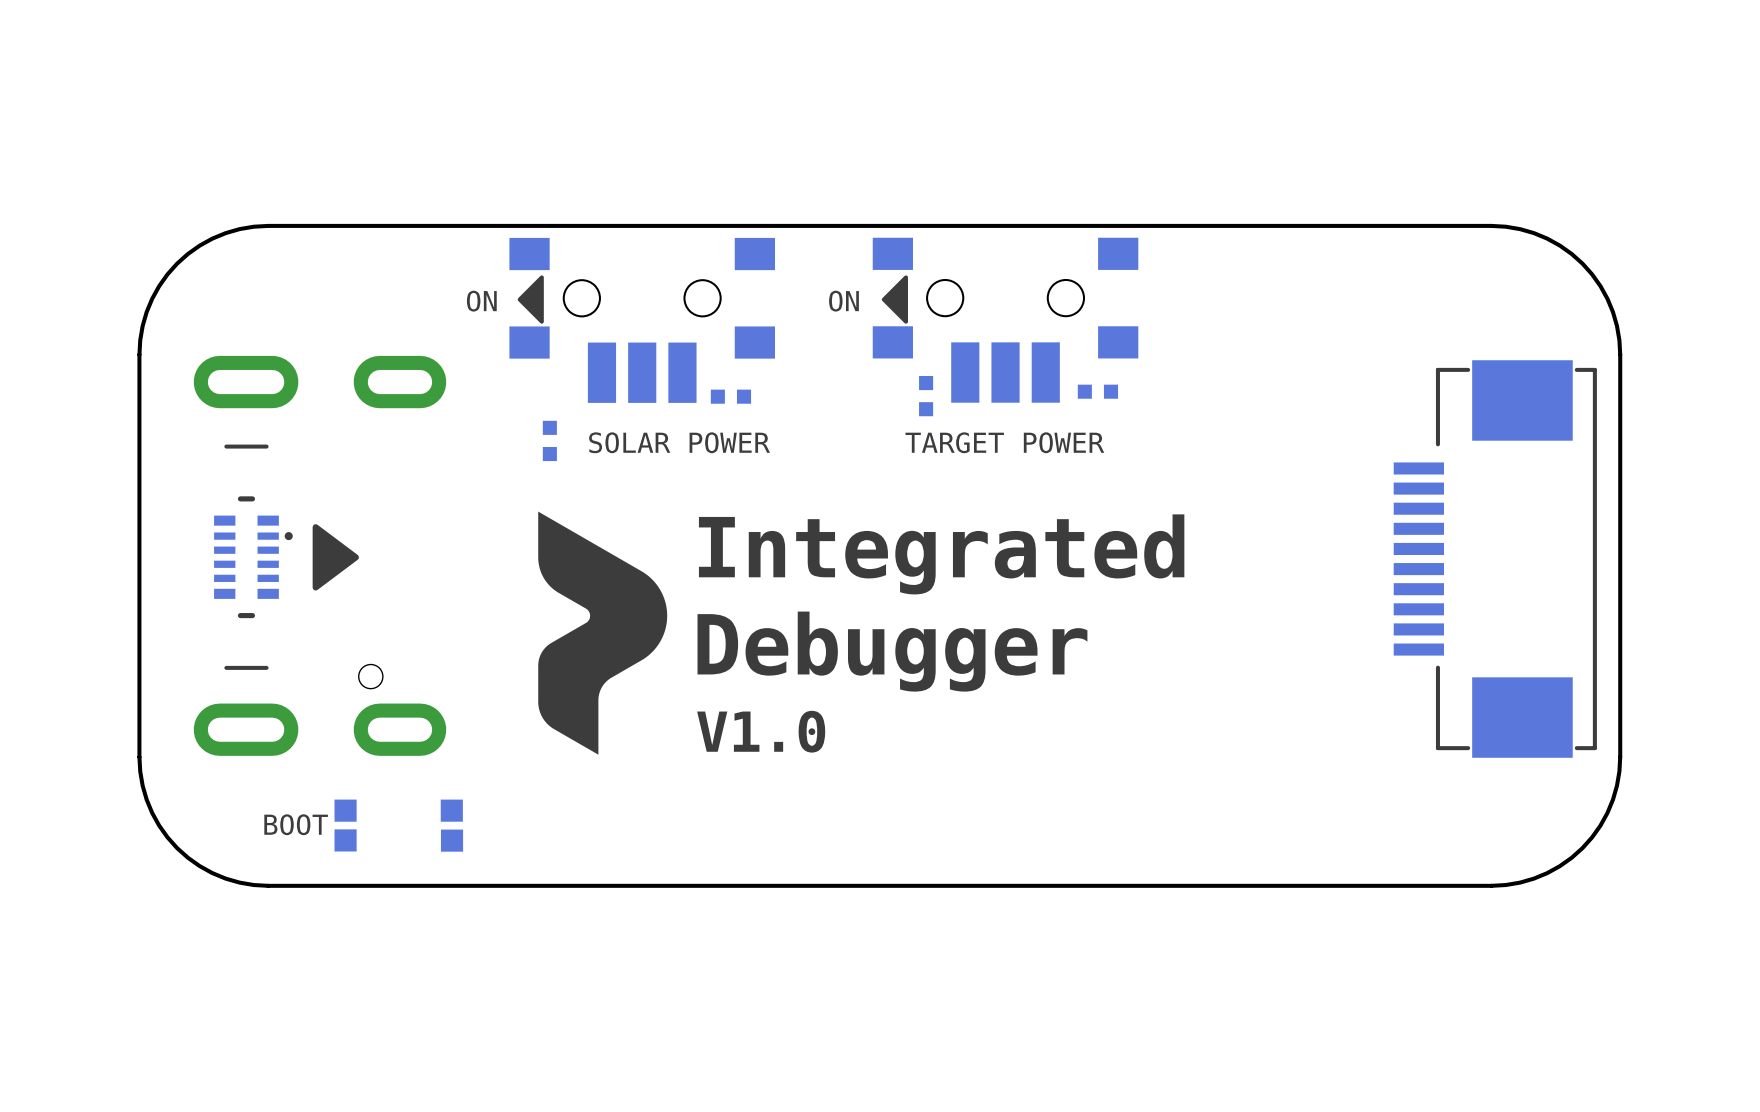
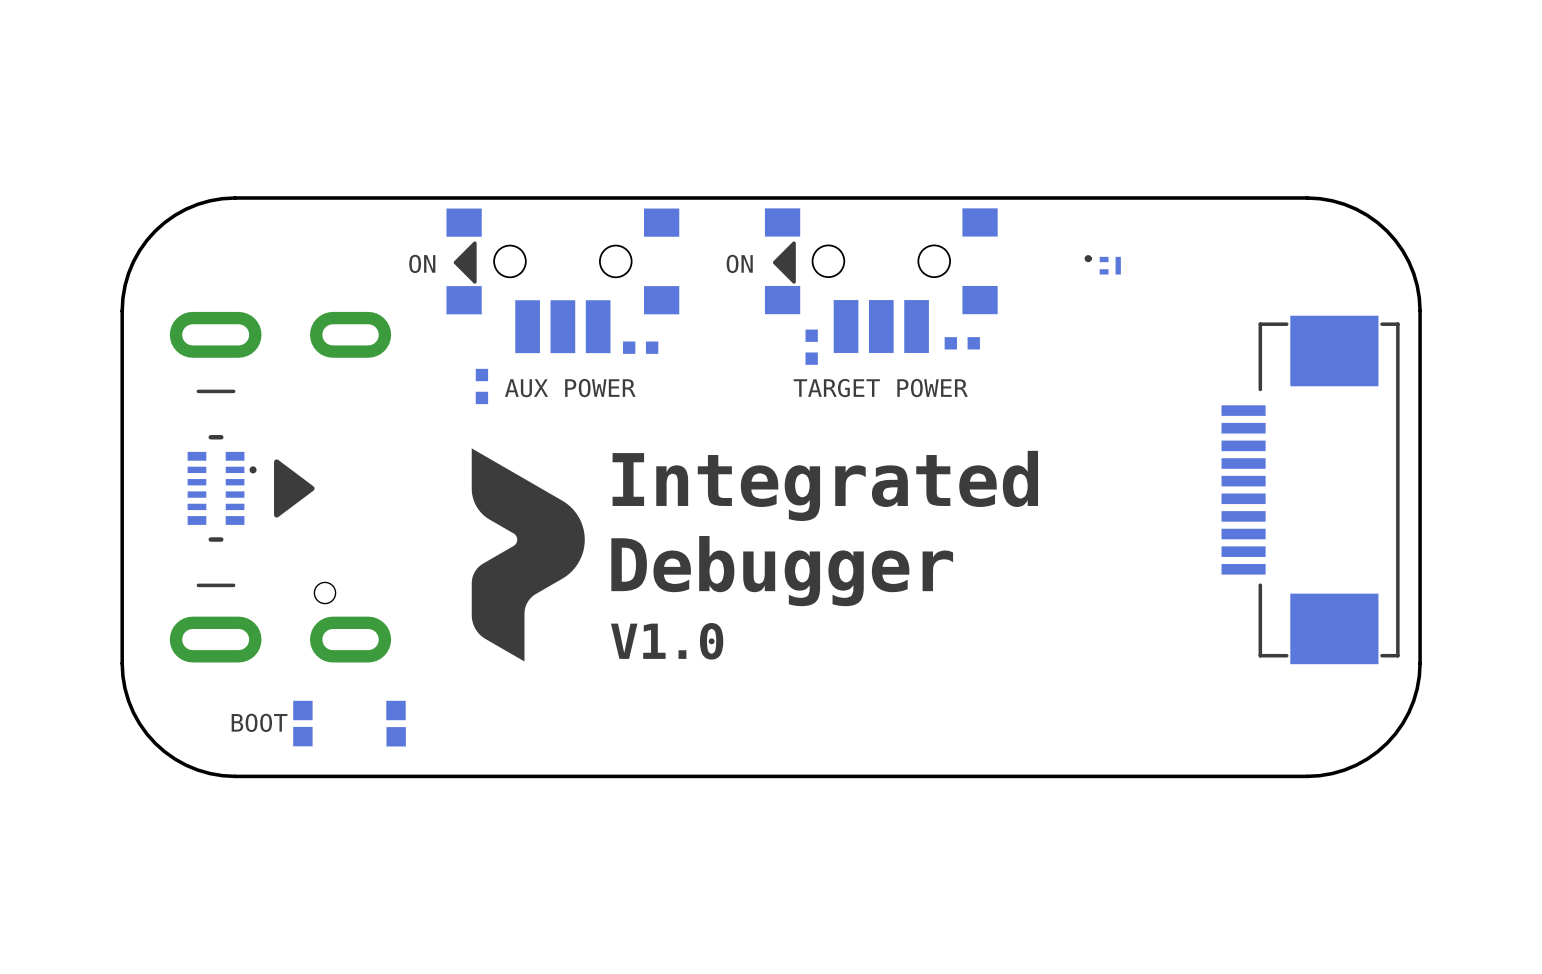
part: none -> (1102, 264)
text: SOLAR POWER (679, 442) -> AUX POWER (570, 388)

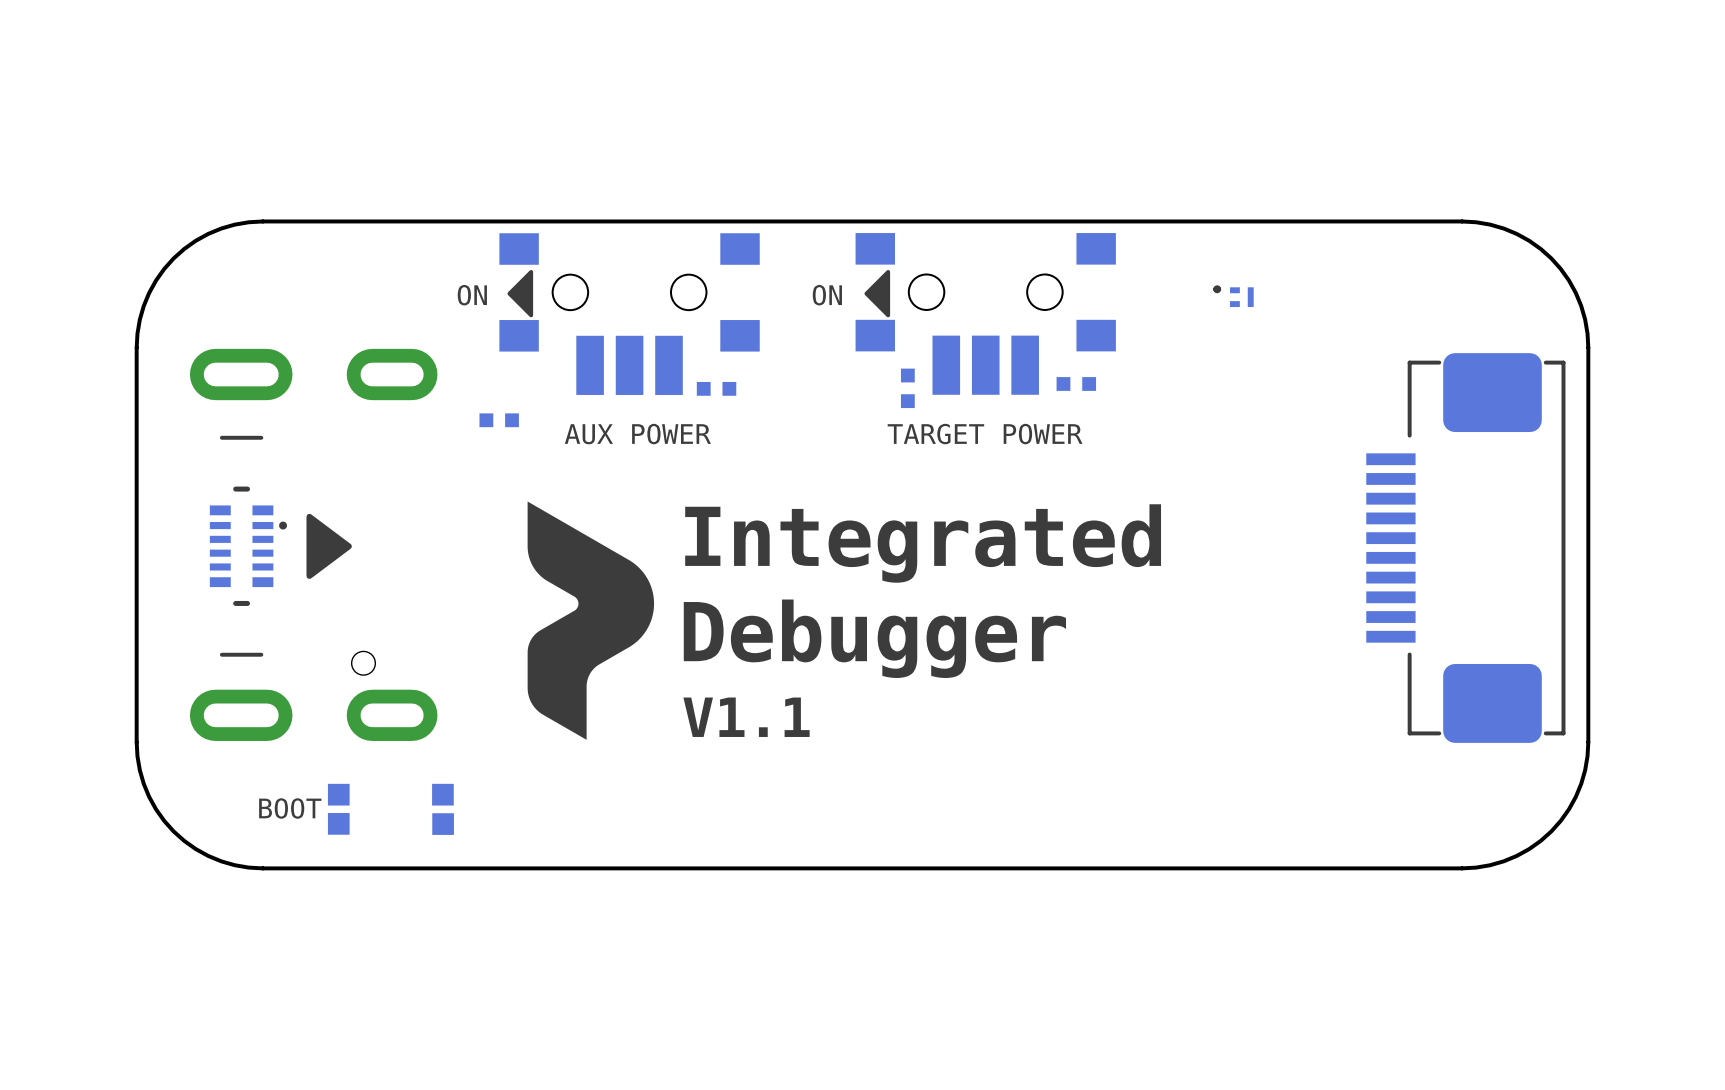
part footprint: [1221, 315, 1400, 665] -> [1366, 353, 1566, 743]
part rotation: 0° (481, 386) -> 90° clockwise (499, 420)
part position: (481, 386) -> (499, 420)
text: V1.0 (667, 641) -> V1.1 (746, 717)

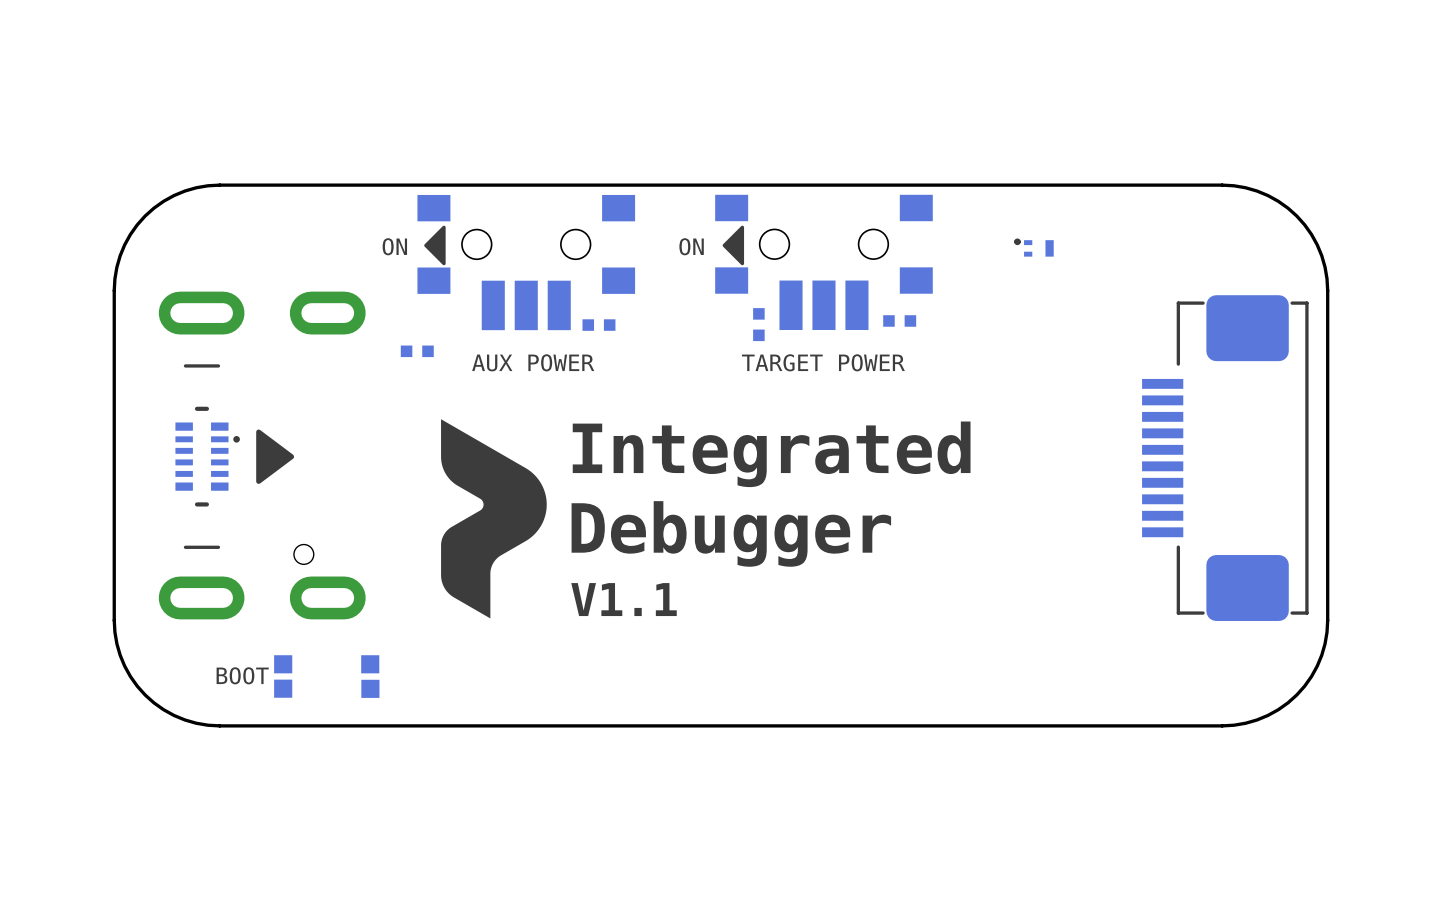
part footprint: [1213, 285, 1254, 308] -> [1014, 238, 1054, 257]

